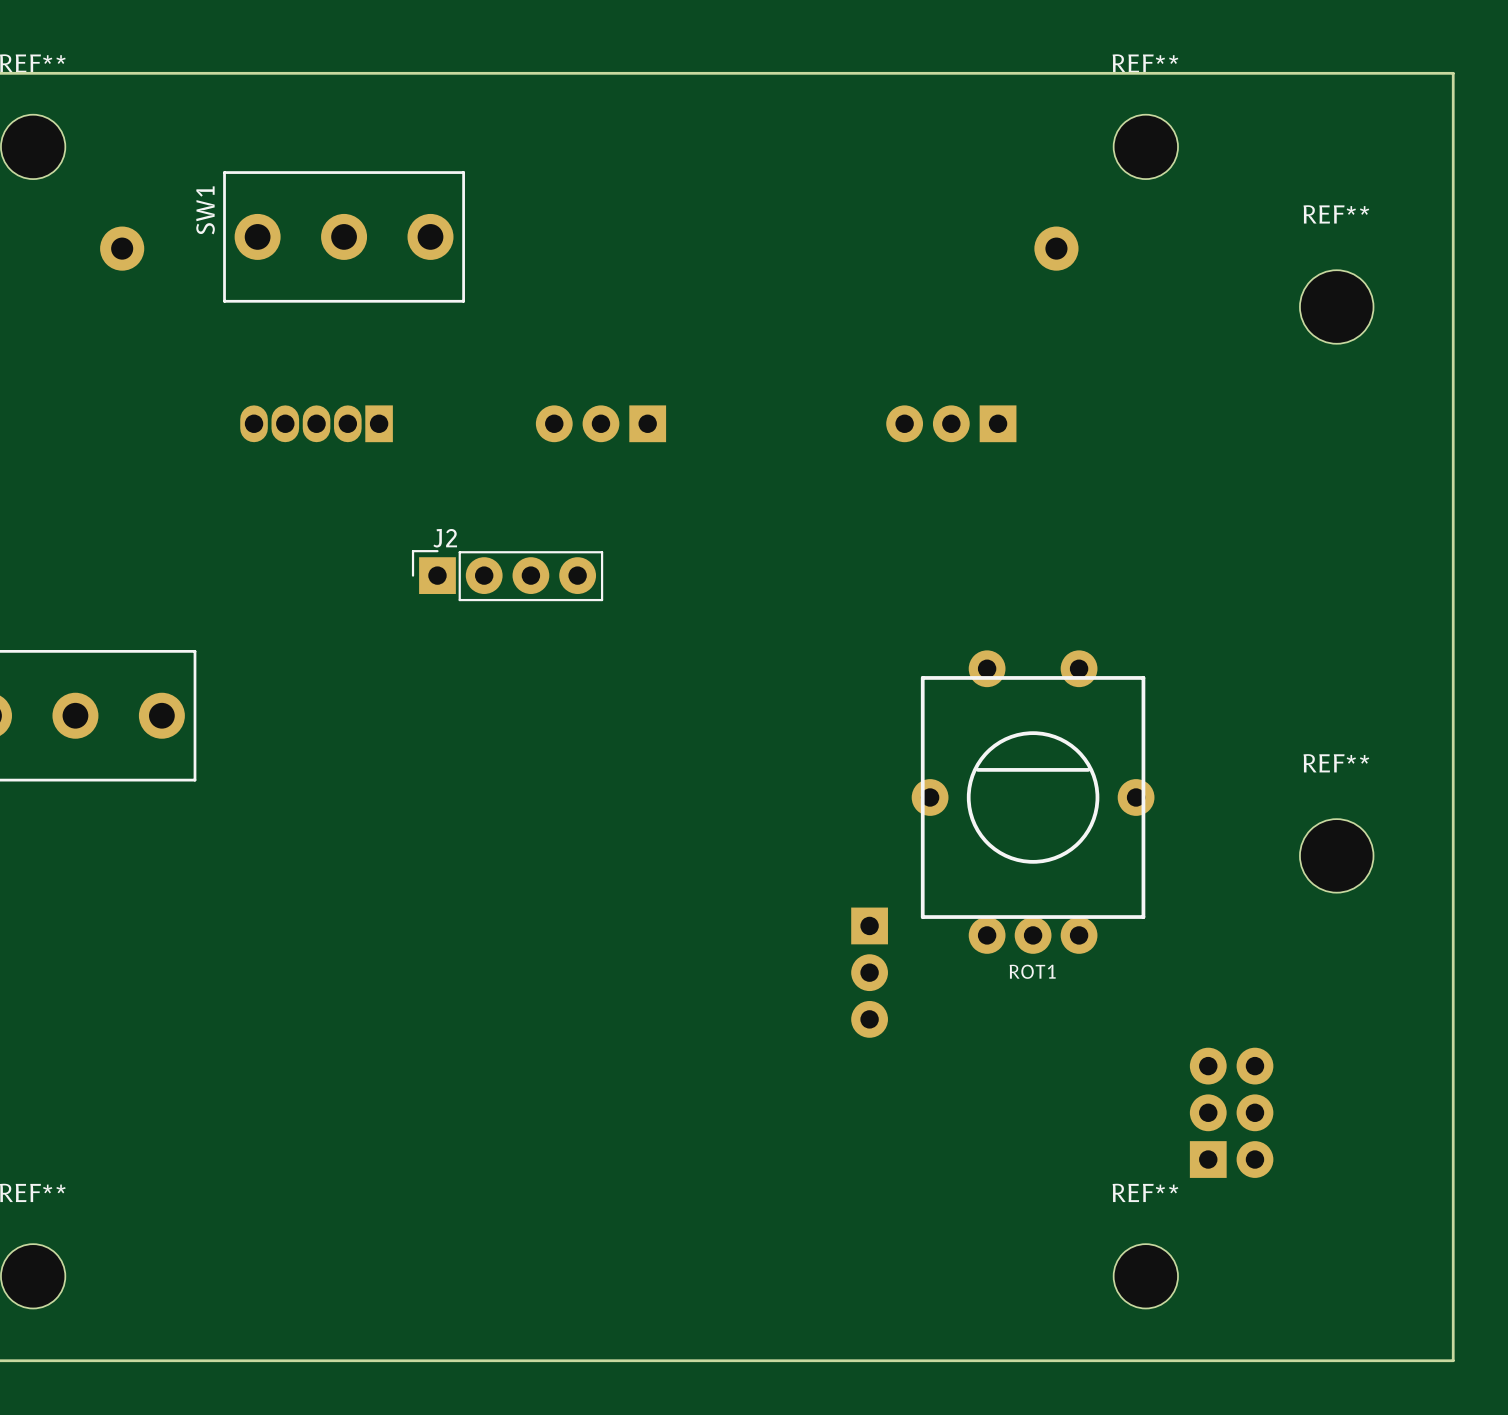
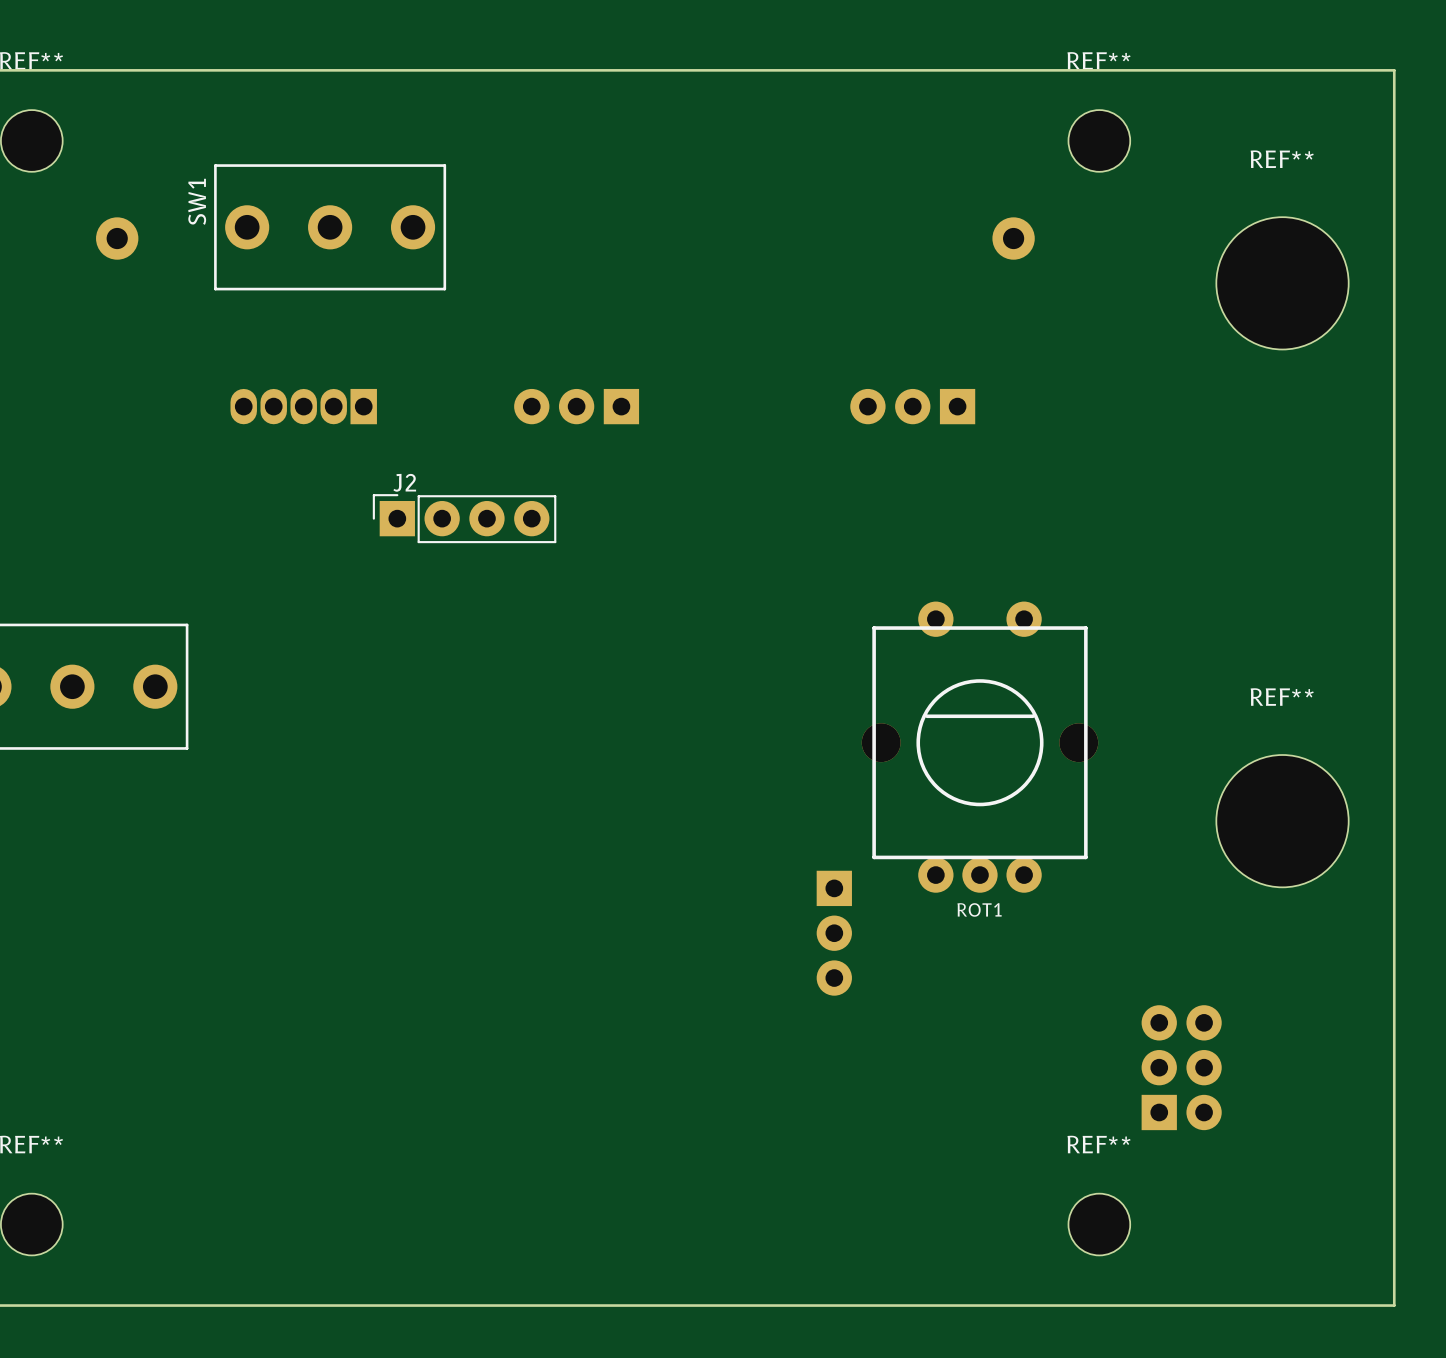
REF** footprint: [1299, 270, 1374, 344] -> [1216, 217, 1349, 350]
J2 position: (507, 575) -> (464, 518)
ROT1 footprint: [911, 650, 1155, 954] -> [861, 601, 1099, 893]
REF** footprint: [1299, 819, 1374, 893] -> [1216, 755, 1349, 888]

